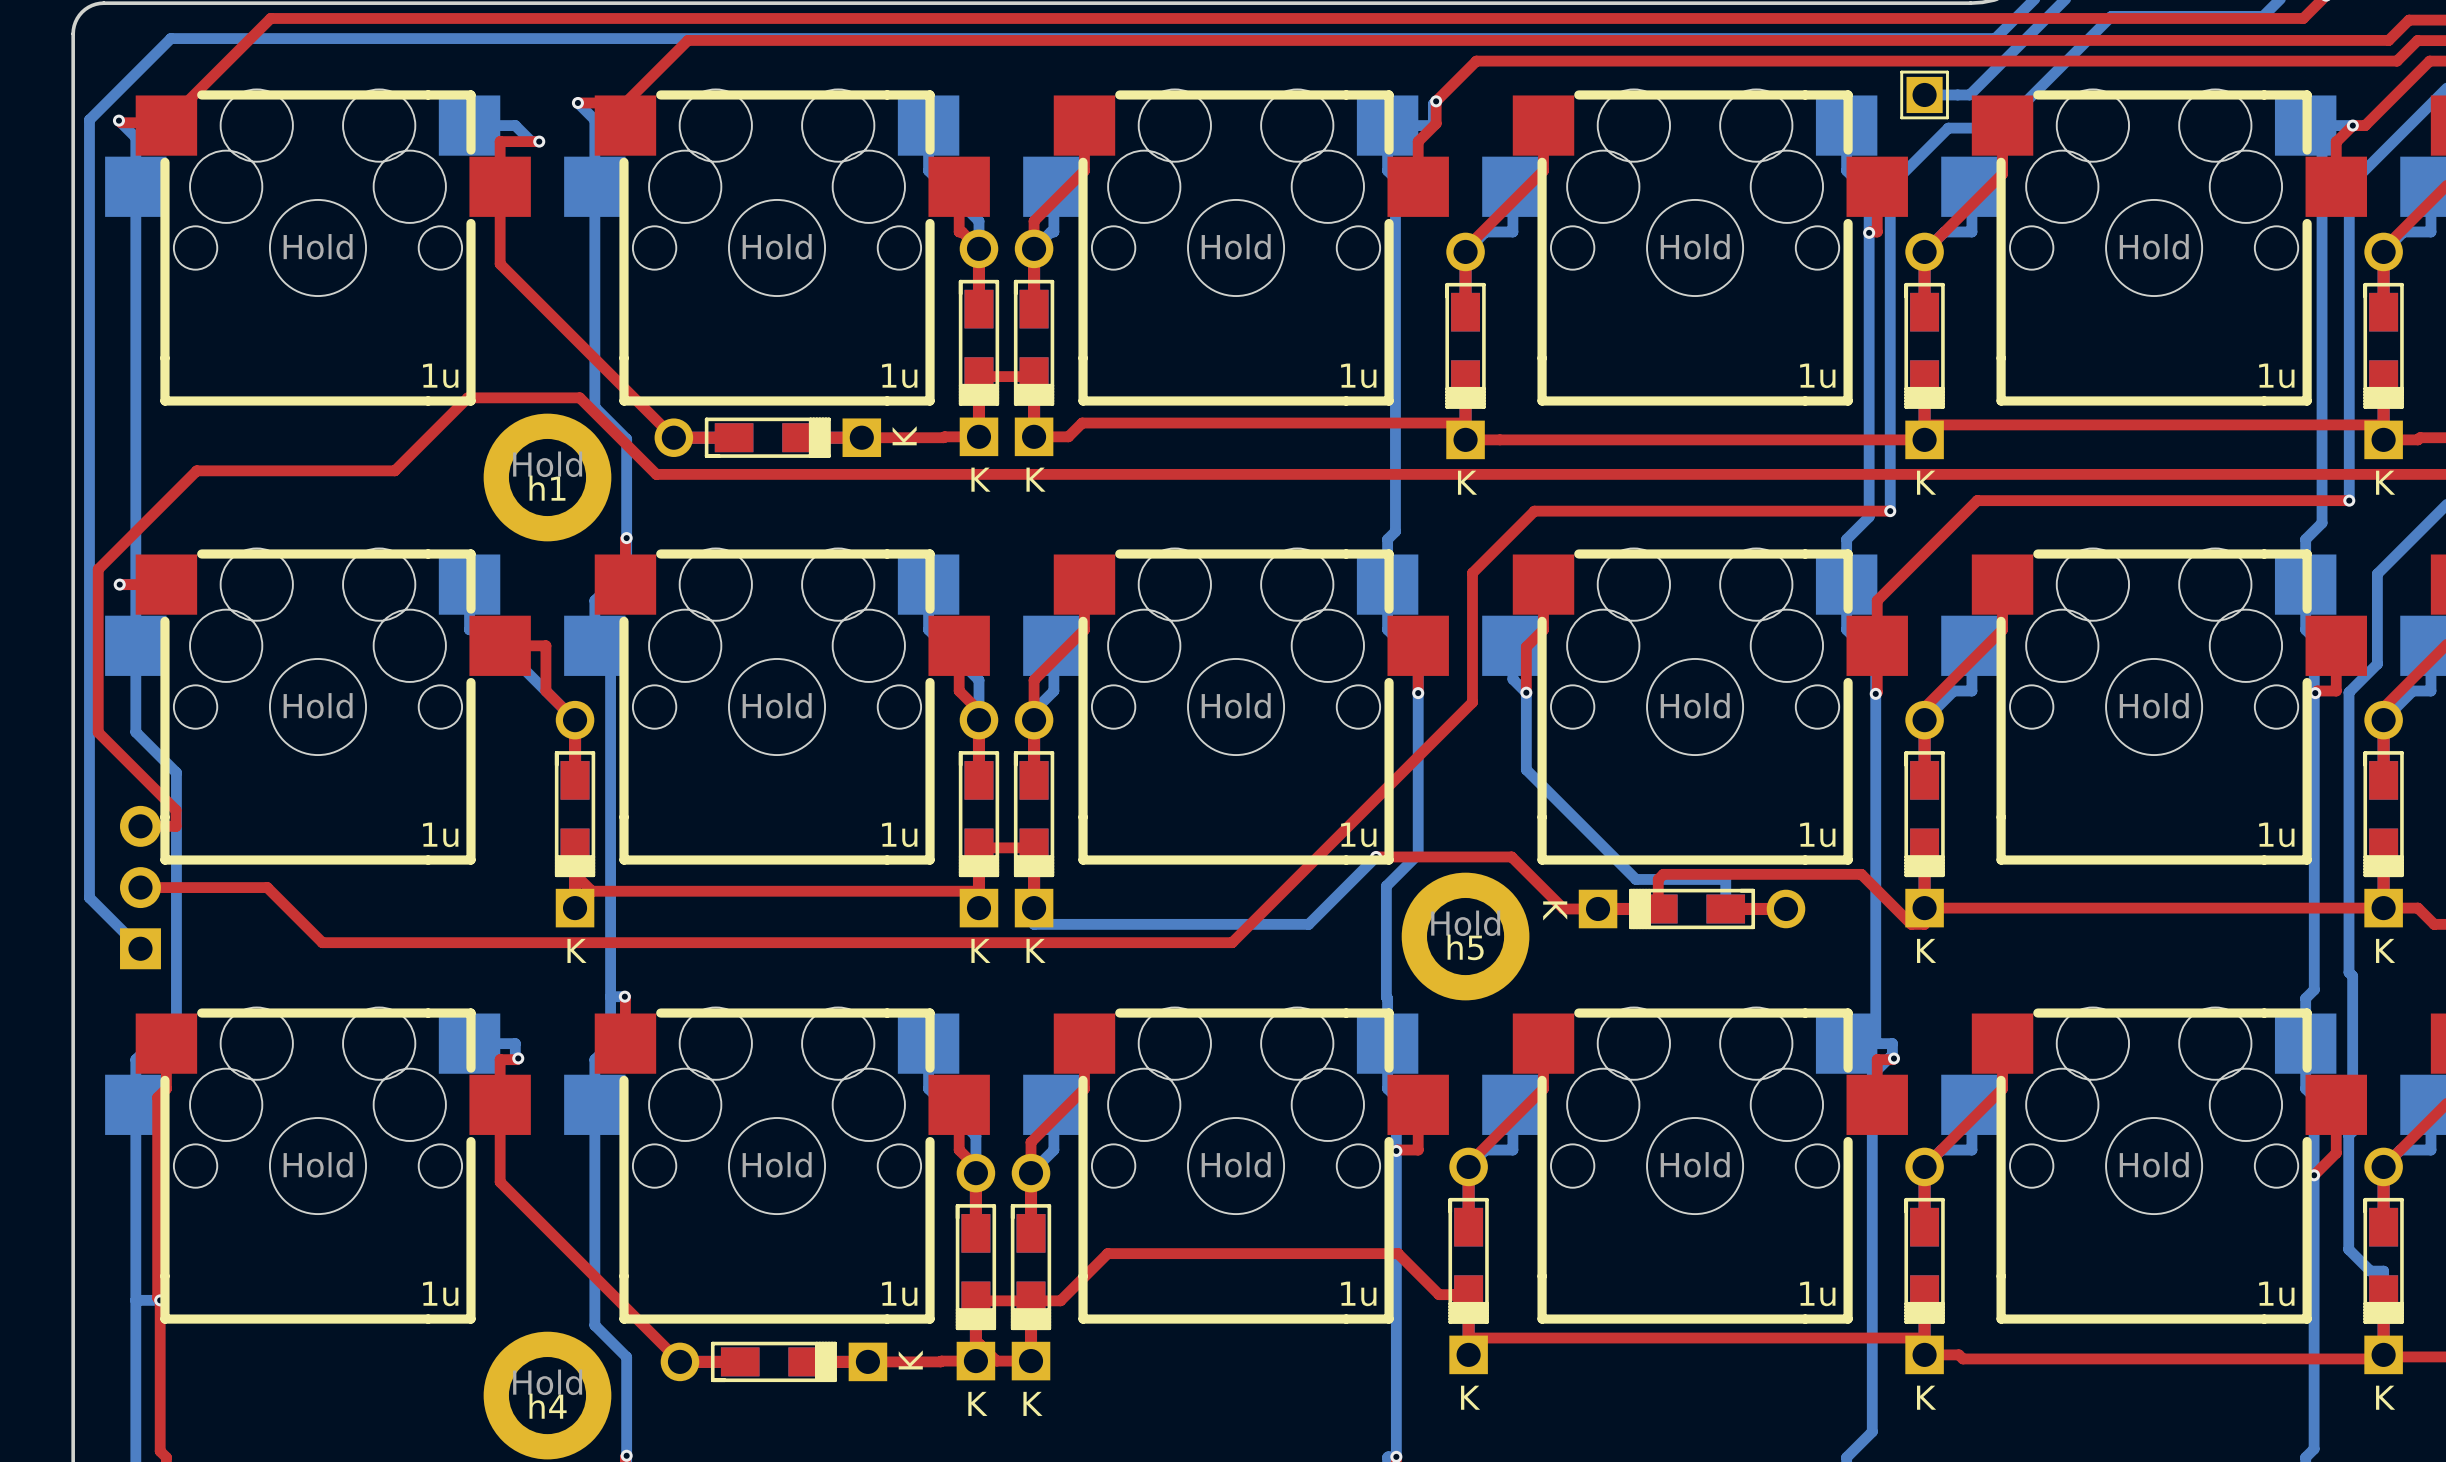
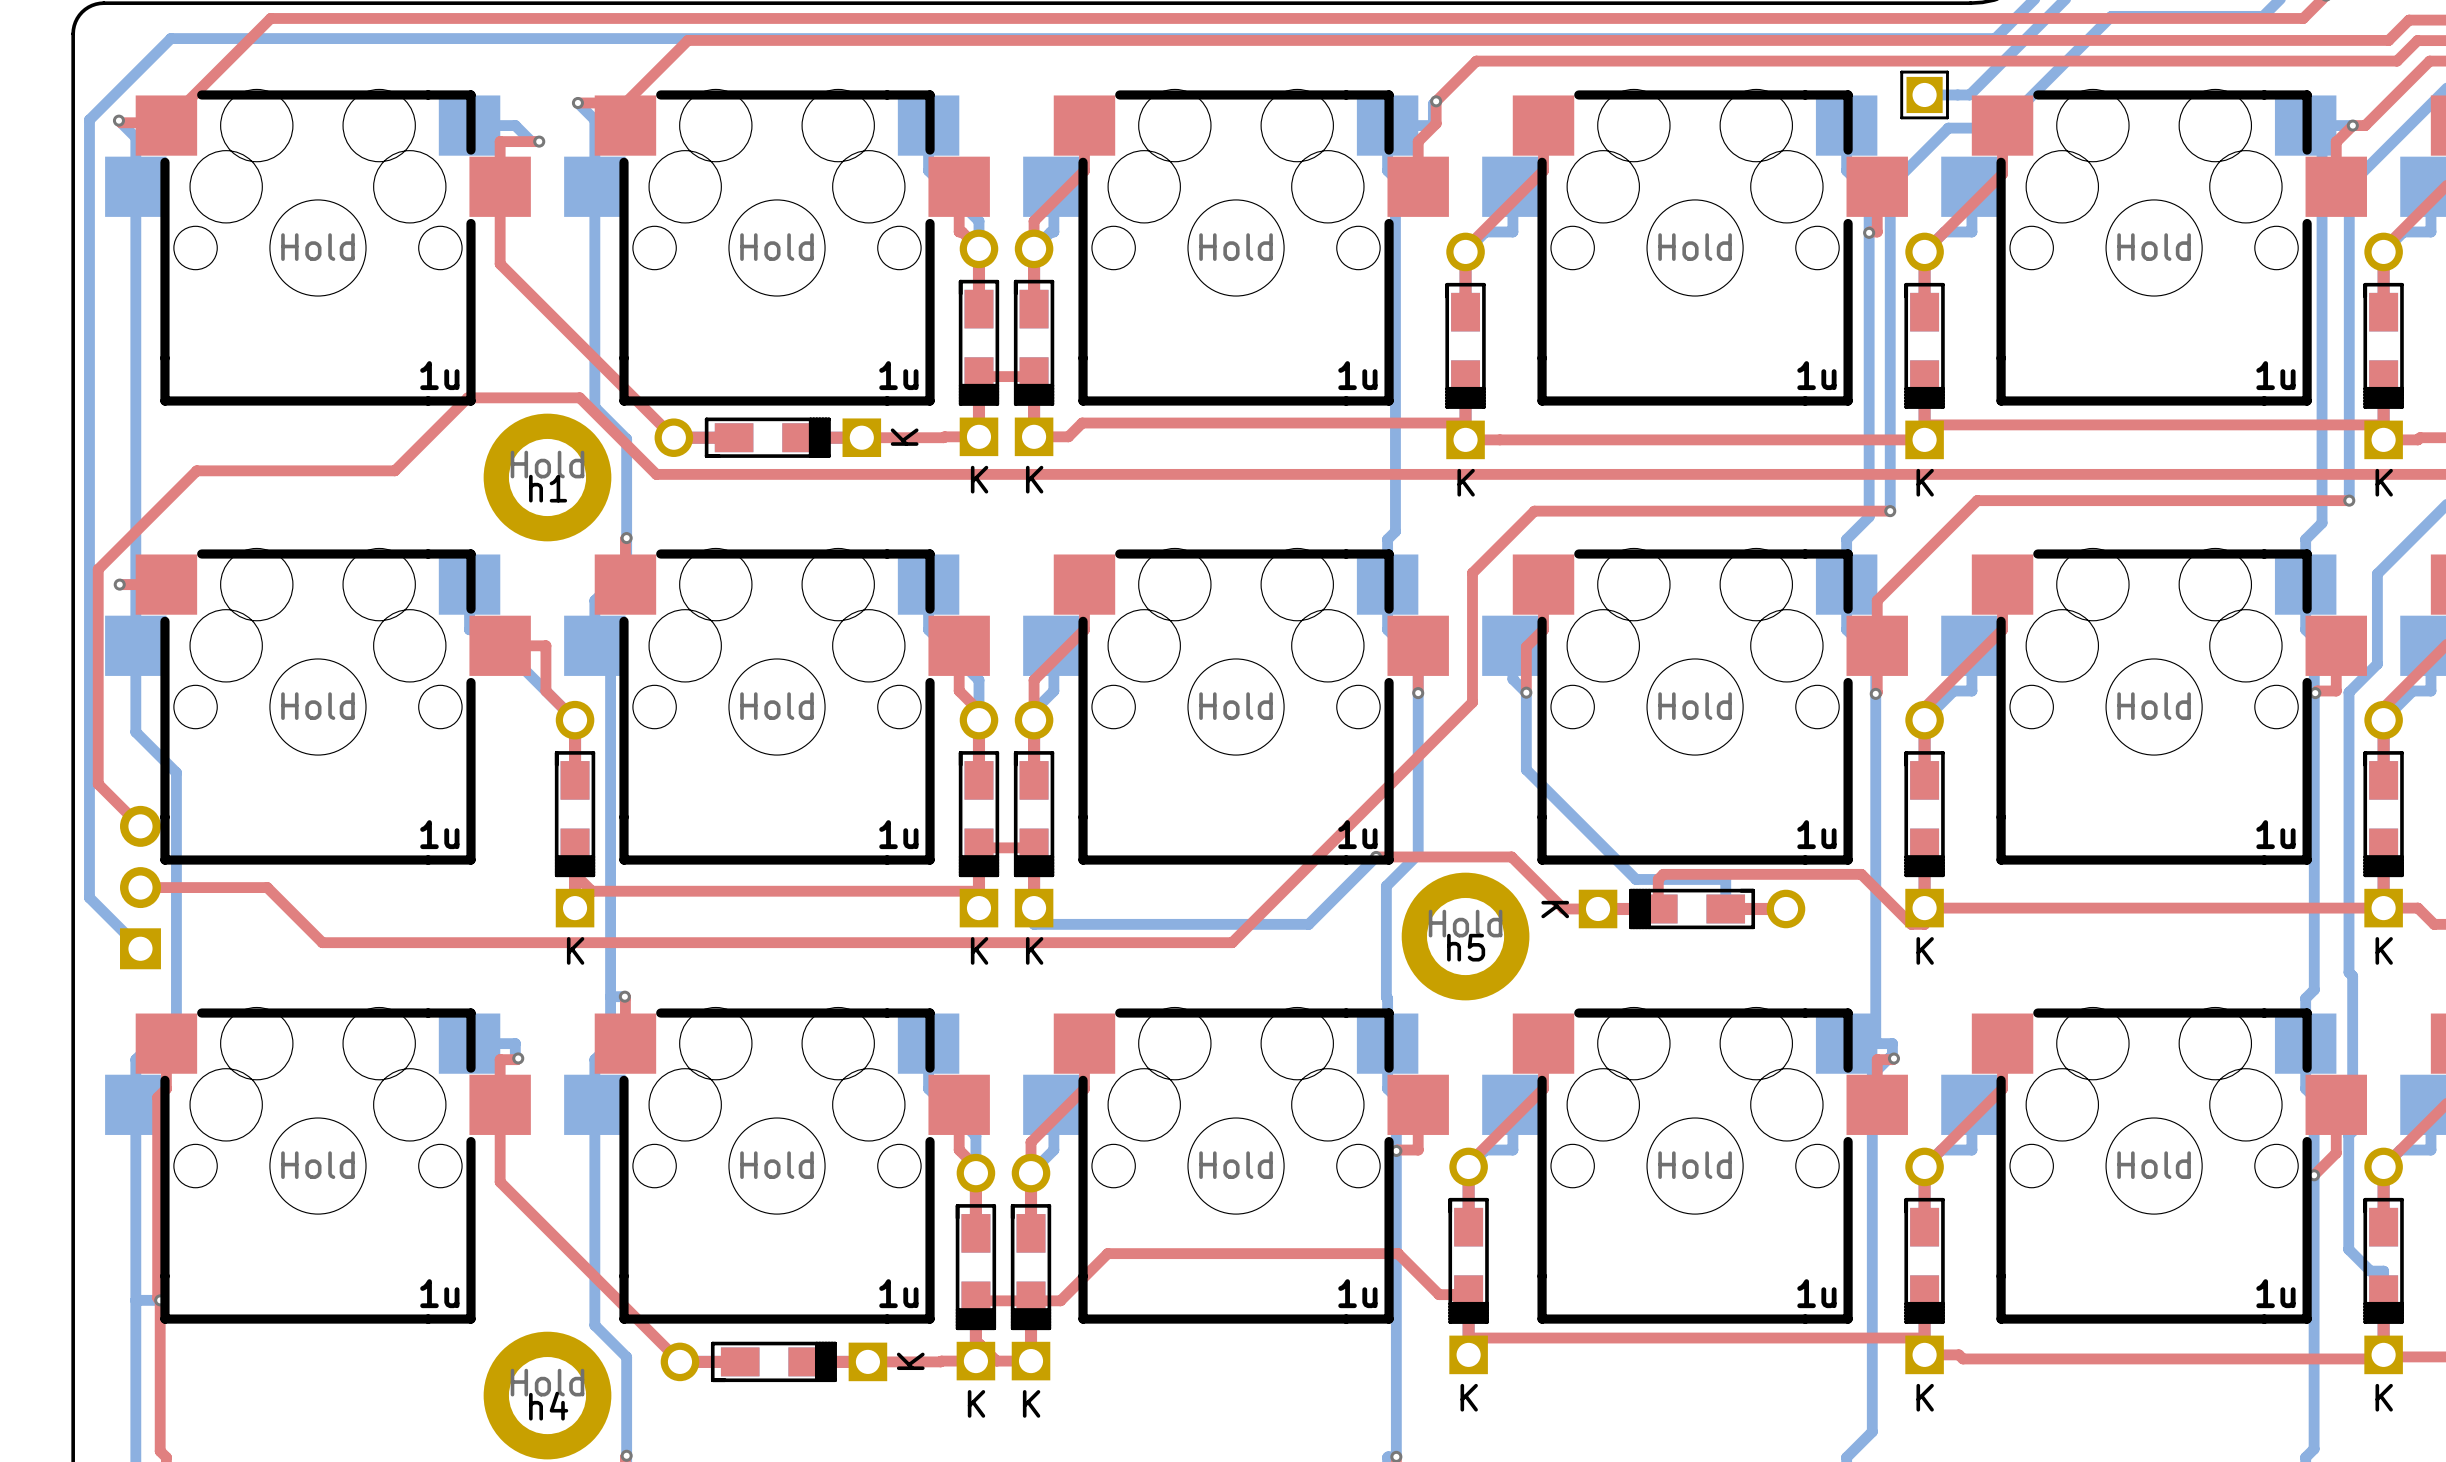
top track: (98, 732) (176, 810) (176, 826) (140, 826) -> (98, 732) (98, 784) (140, 826)

